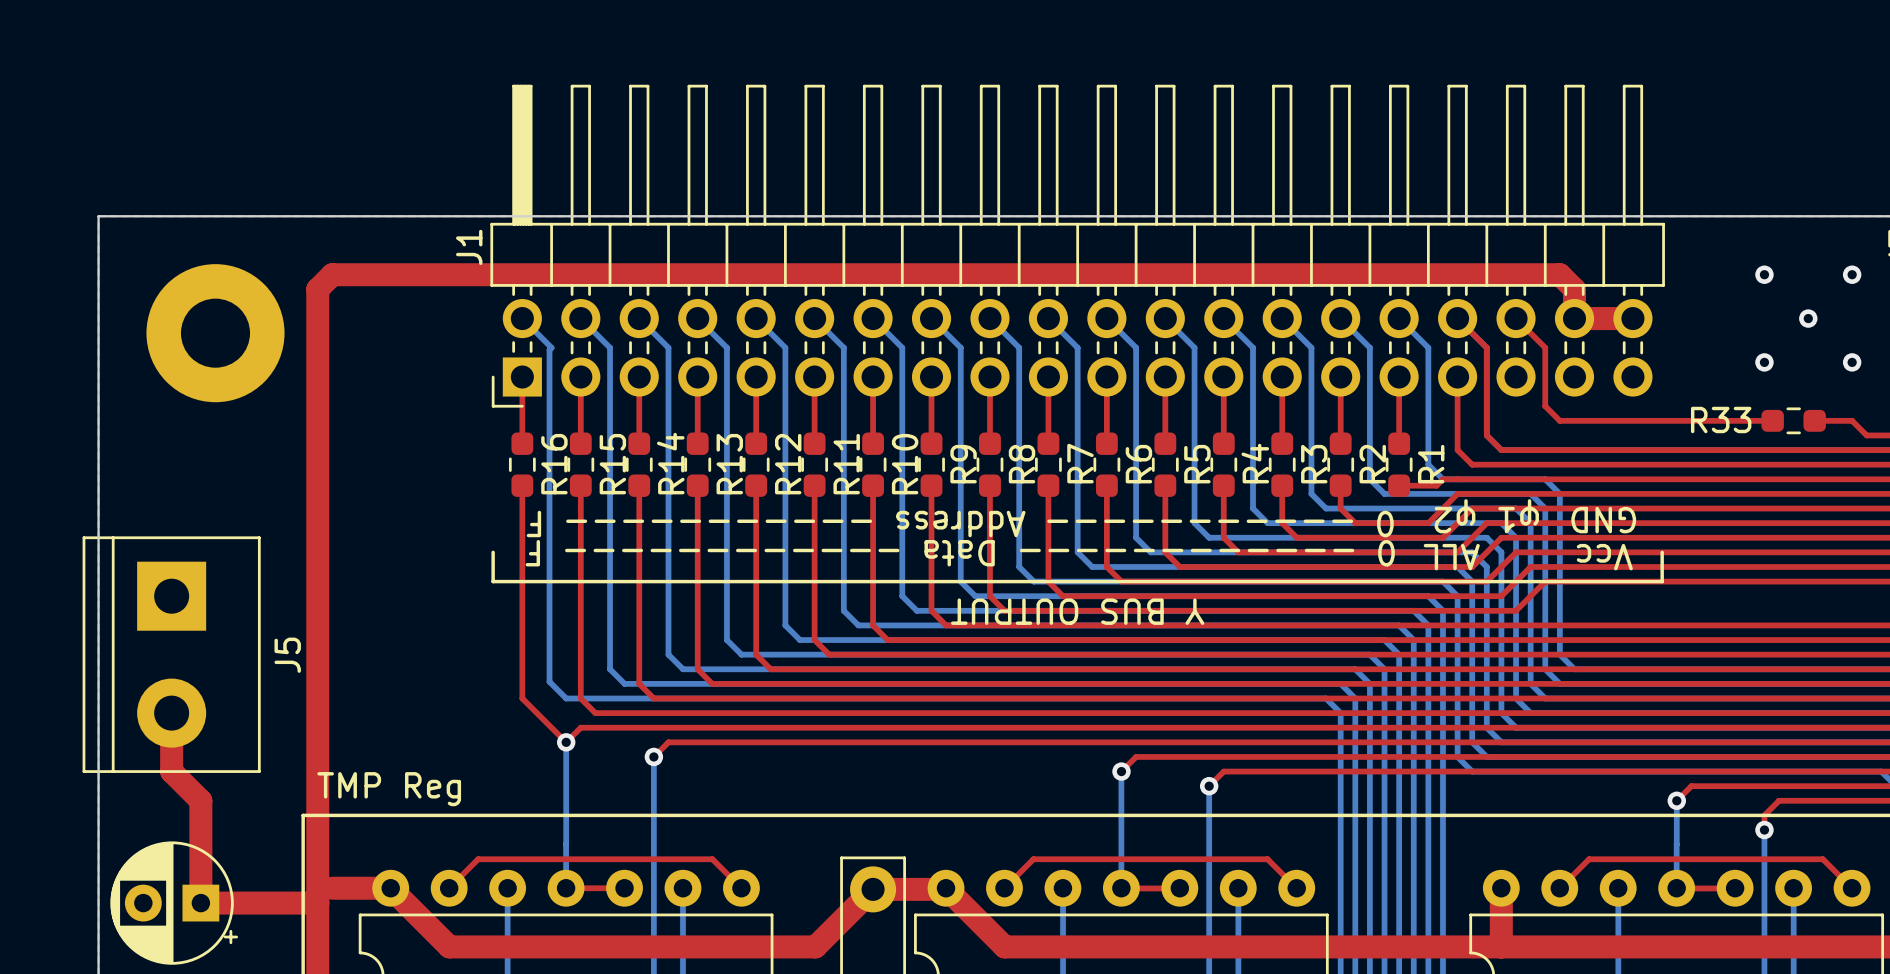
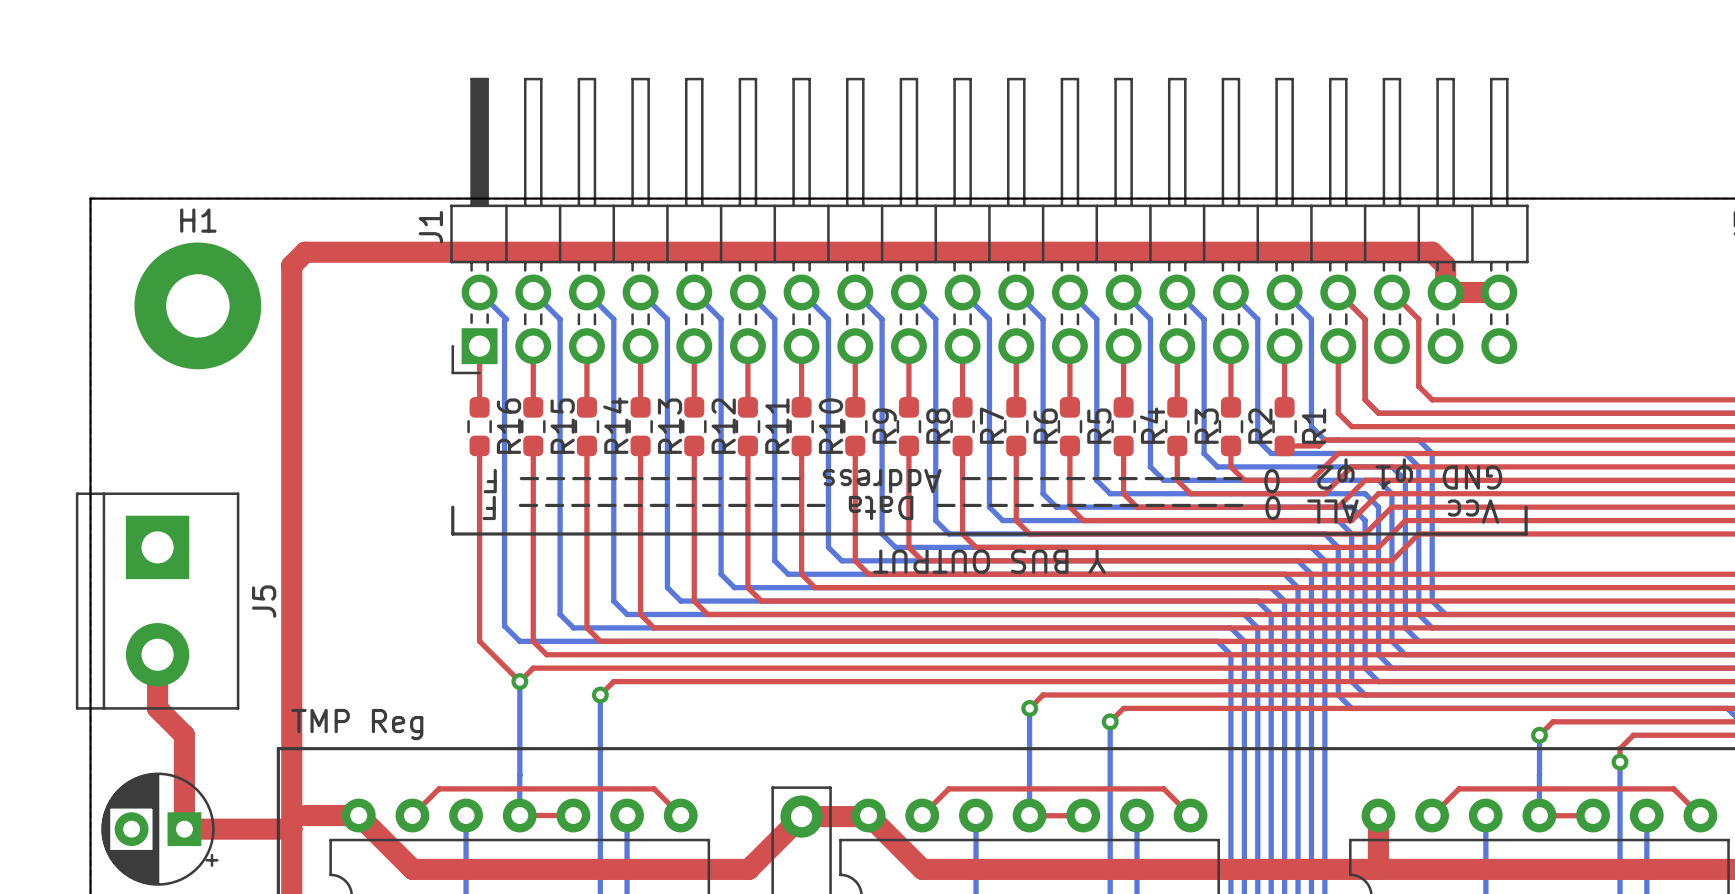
H1 name: none -> H1 (198, 220)
via: (1764, 274) -> none
via: (1852, 274) -> none
via: (1808, 318) -> none
via: (1764, 362) -> none
via: (1852, 362) -> none
top track: (1545, 406) (1559, 420) (1772, 420) -> (1418, 372) (1418, 386) (1432, 399) (1713, 399)
R33: (1793, 420) -> none
top track: (1814, 420) (1852, 420) (1866, 435) -> none

